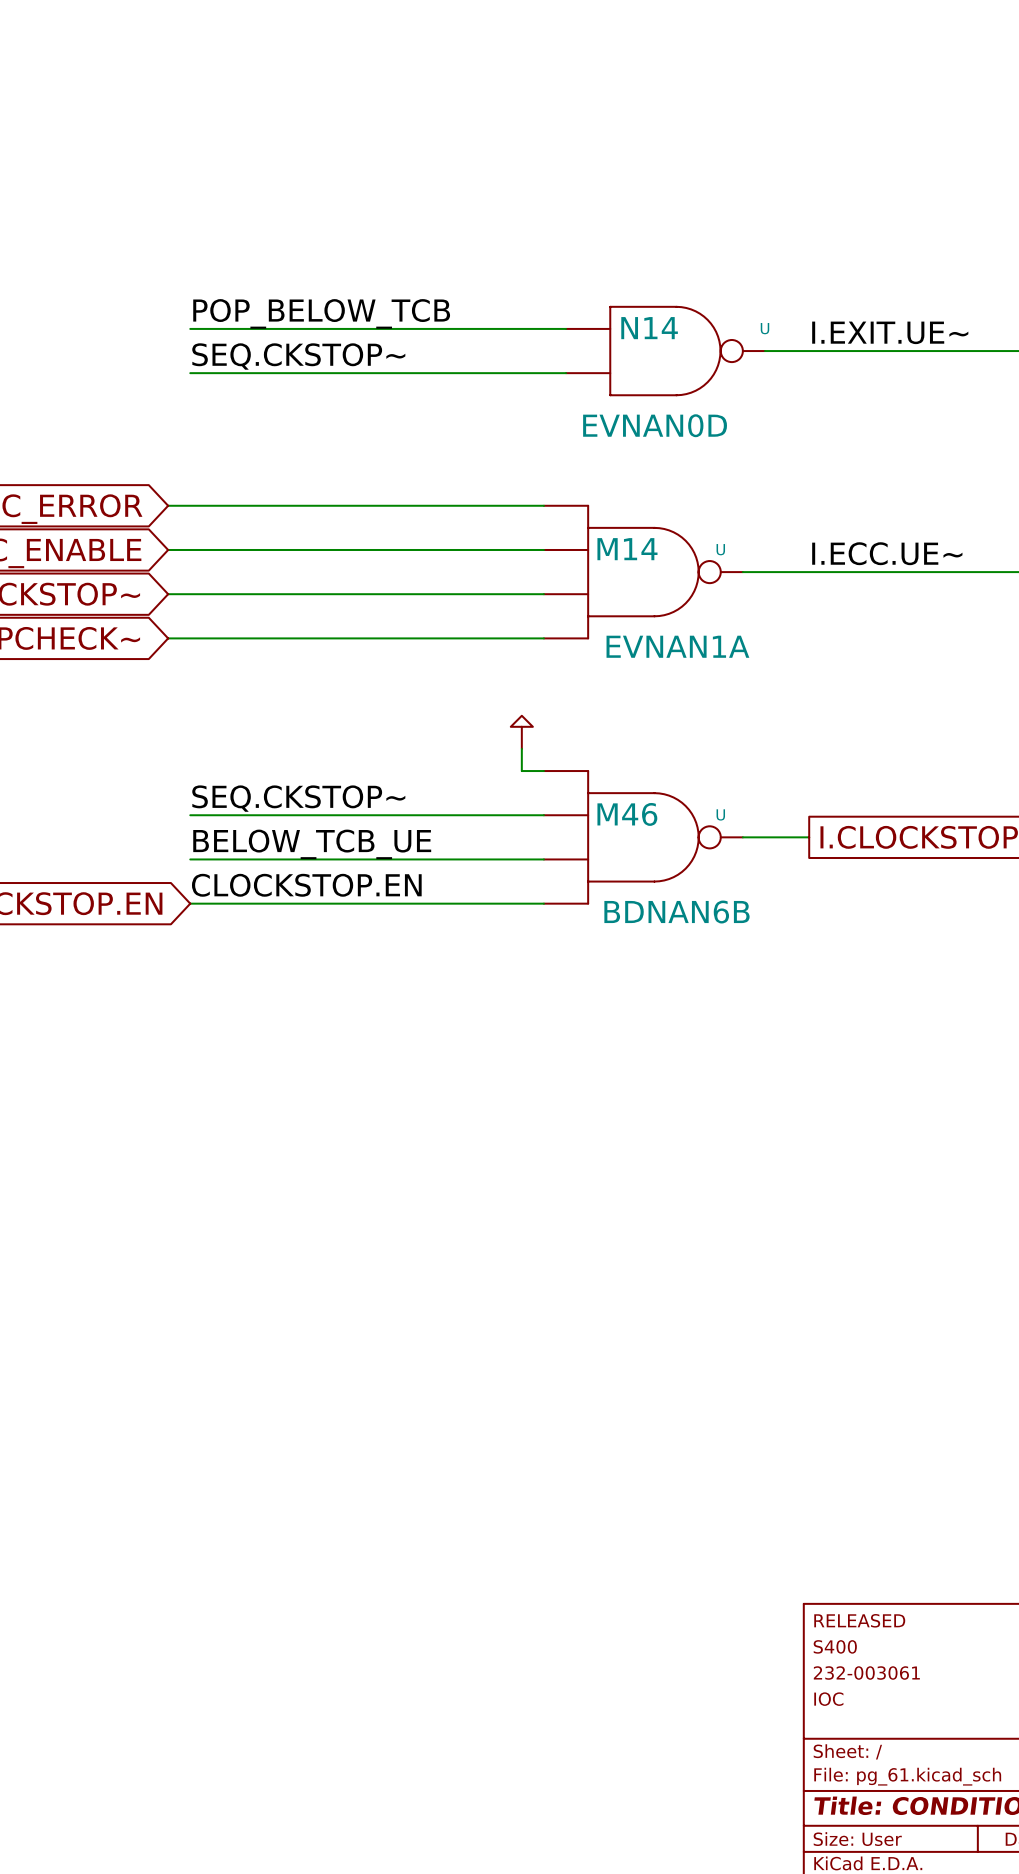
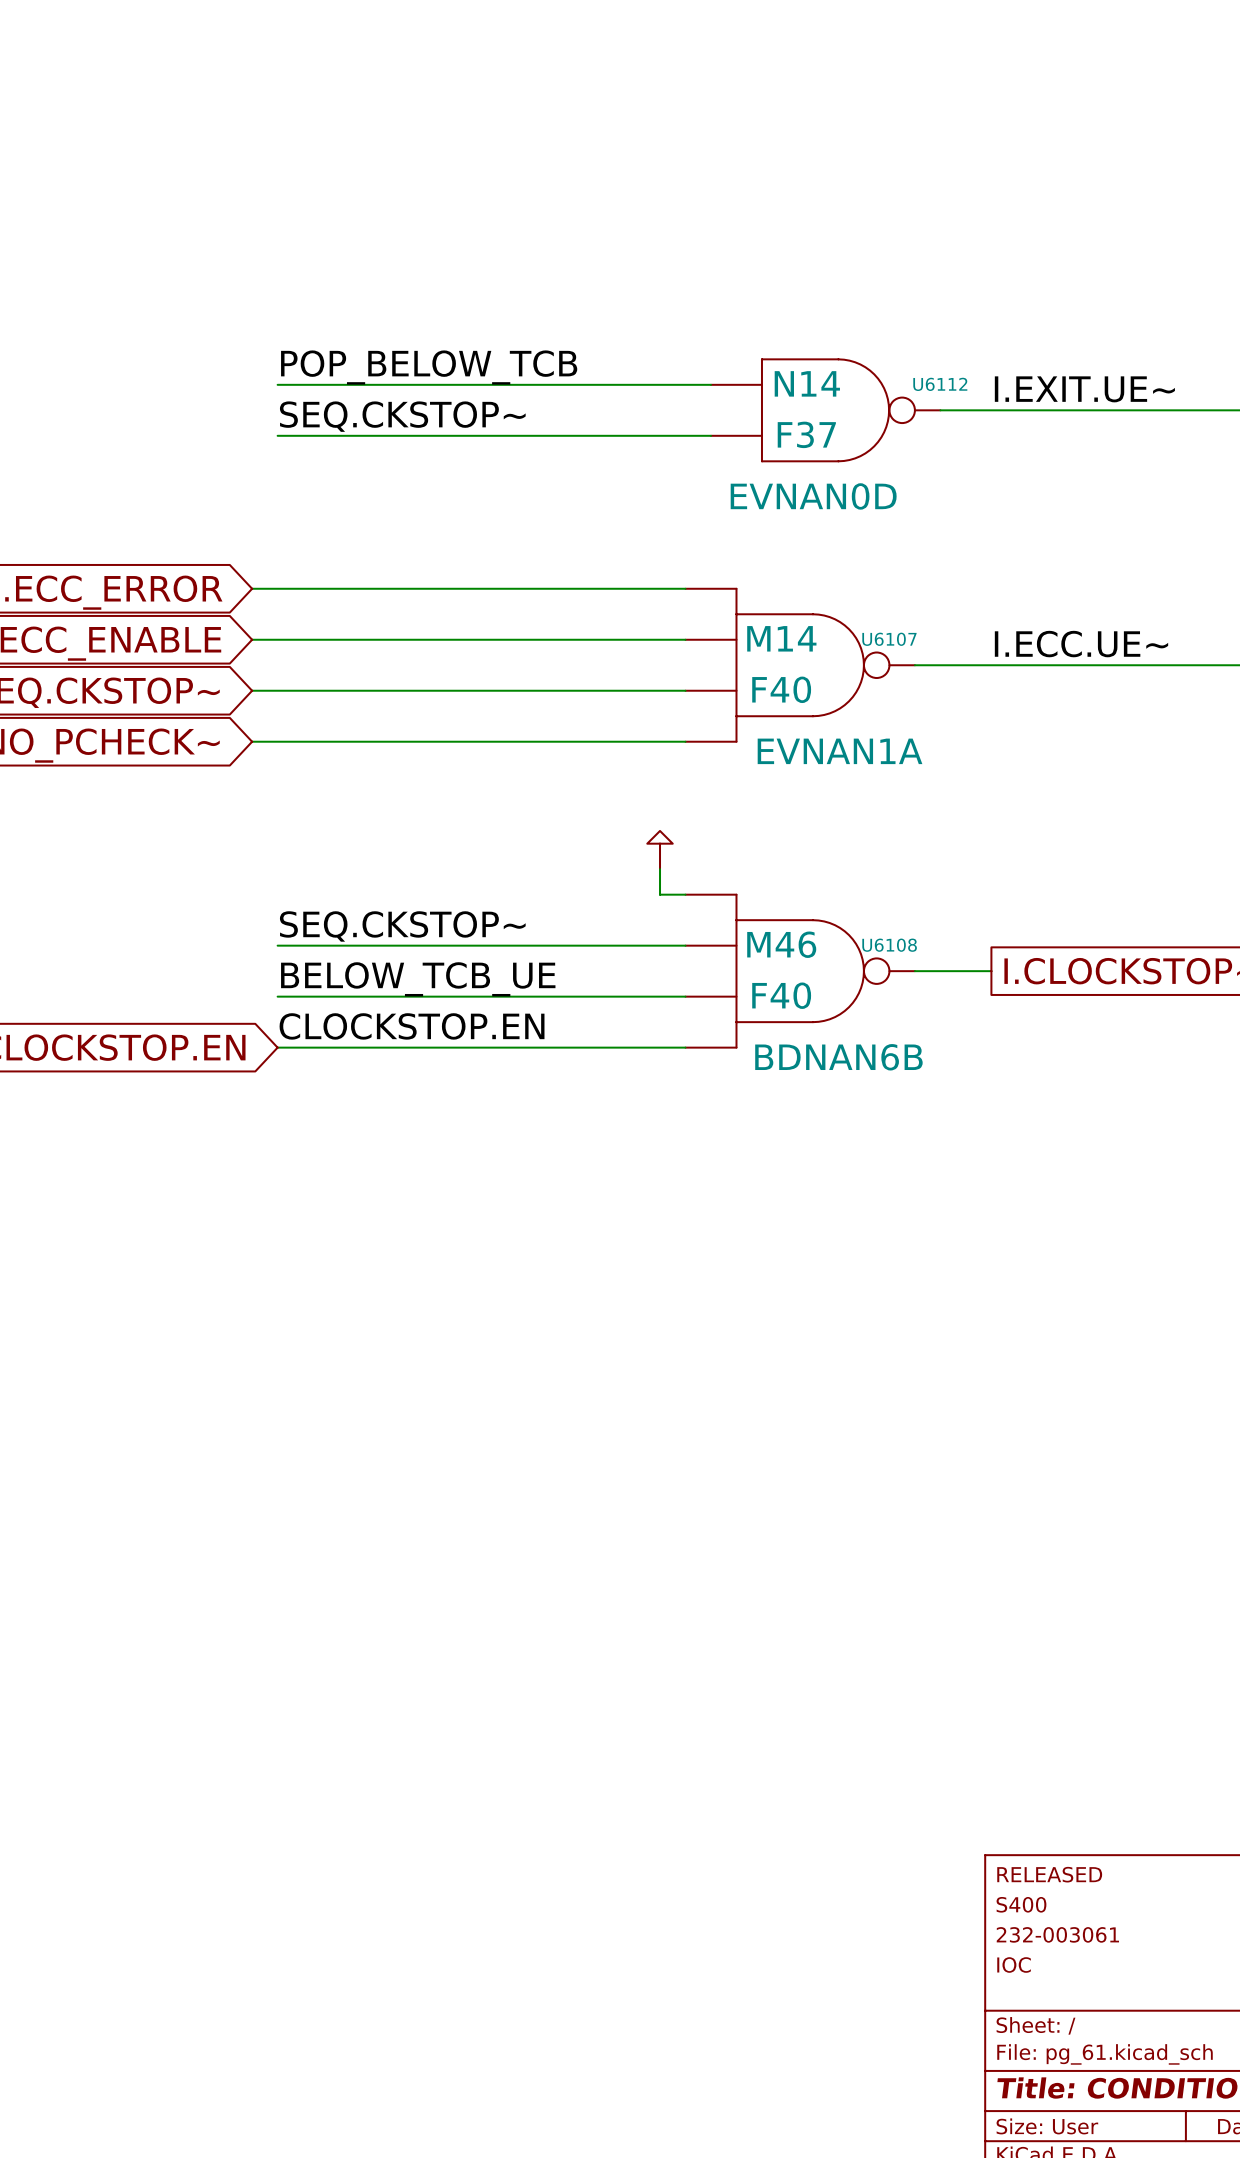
U name: U (764, 328) -> U6112 (940, 384)
U value: none -> F37 (806, 434)
U name: U (720, 549) -> U6107 (889, 639)
U value: none -> F40 (781, 689)
U name: U (720, 814) -> U6108 (889, 945)
U value: none -> F40 (781, 995)

